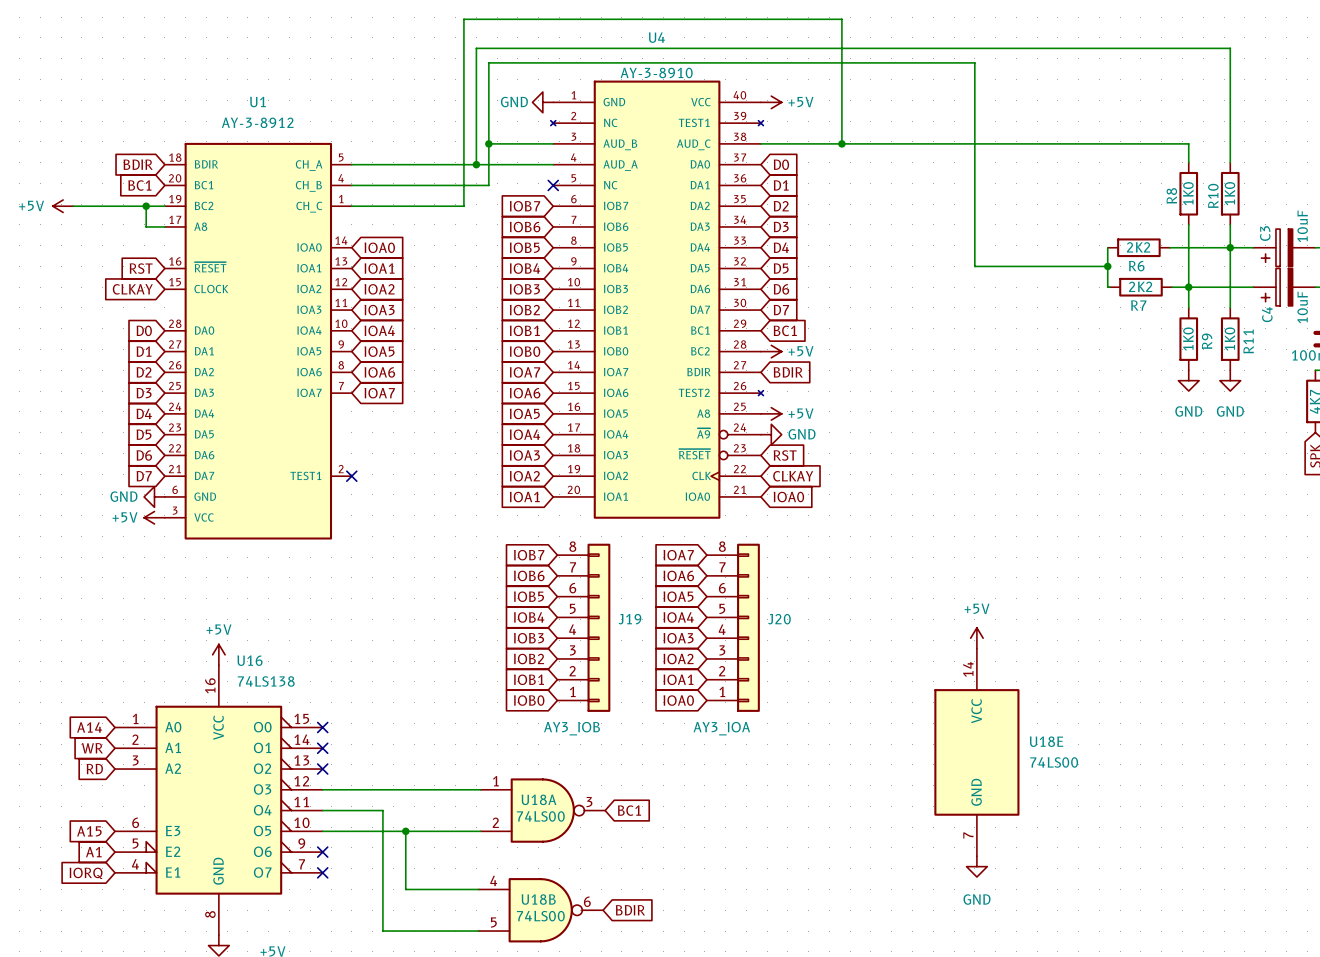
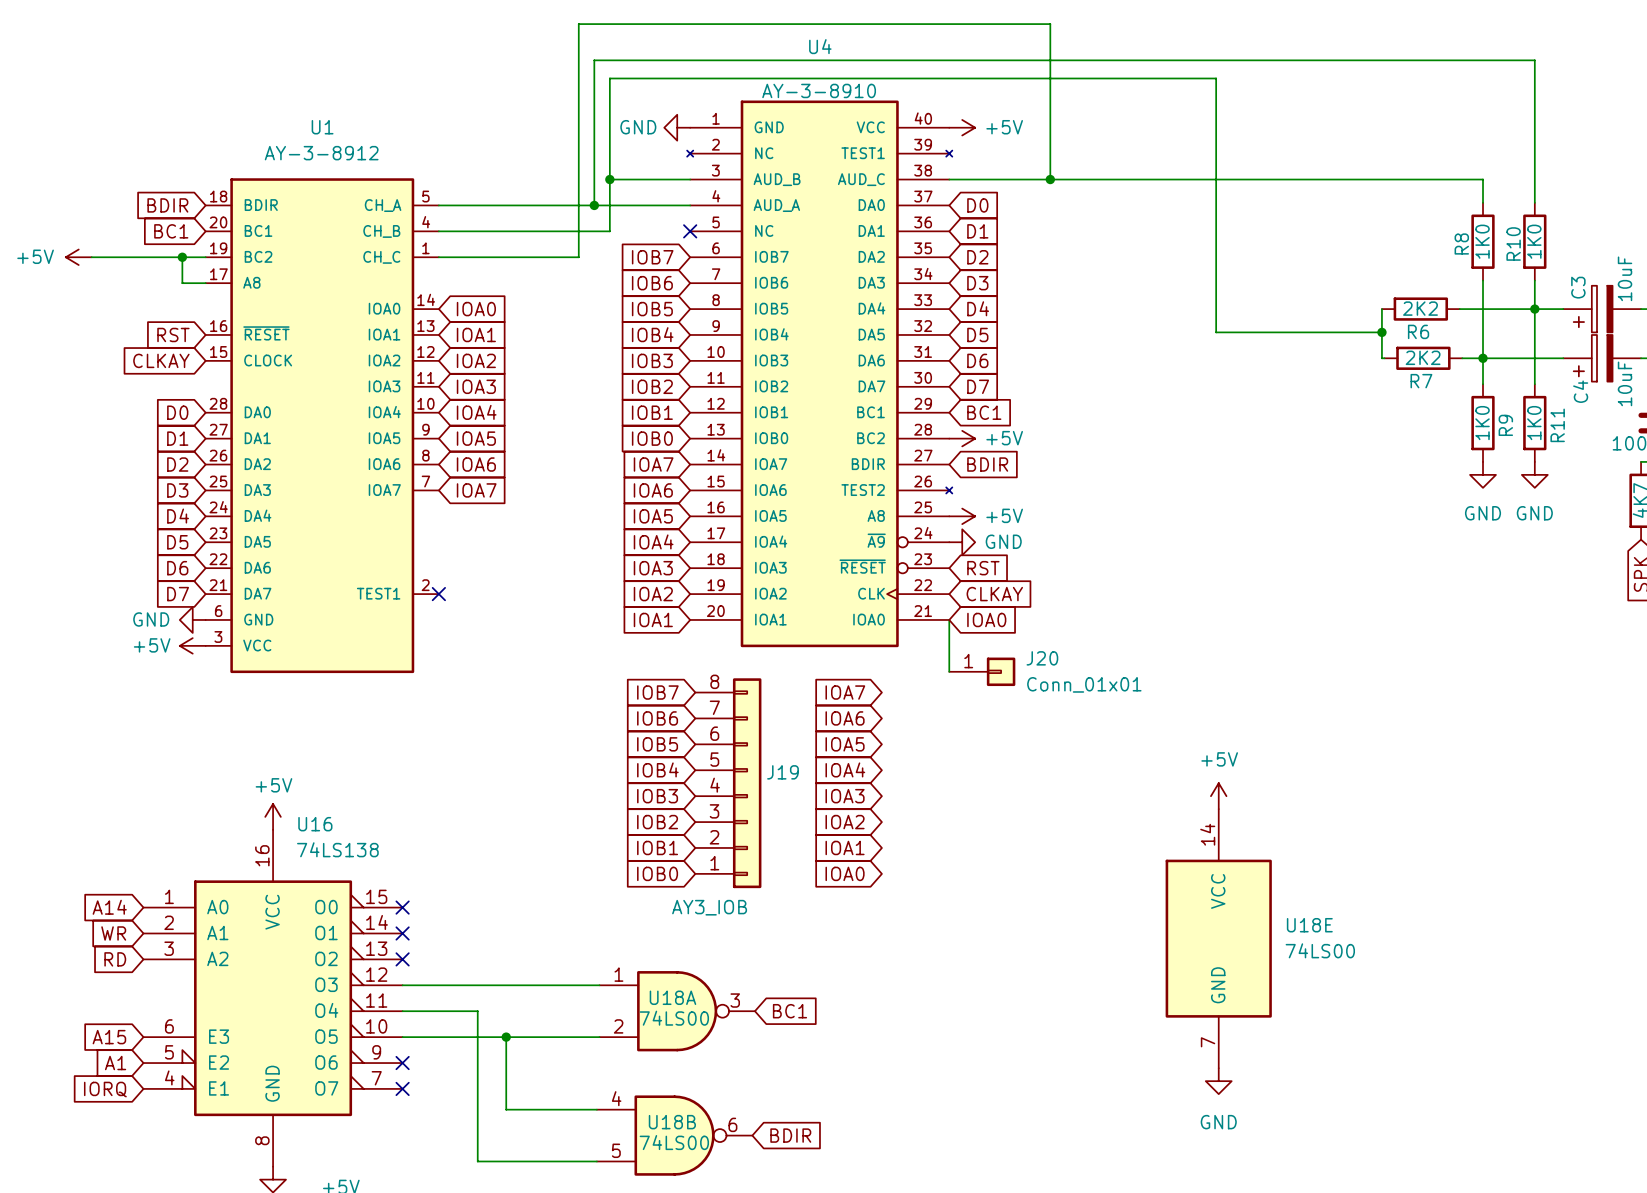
wire: none -> (949, 619) (949, 671)
J20 symbol: [706, 543, 760, 712] -> [949, 657, 1016, 687]
J20 value: AY3_IOA (721, 728) -> Conn_01x01 (1084, 684)

